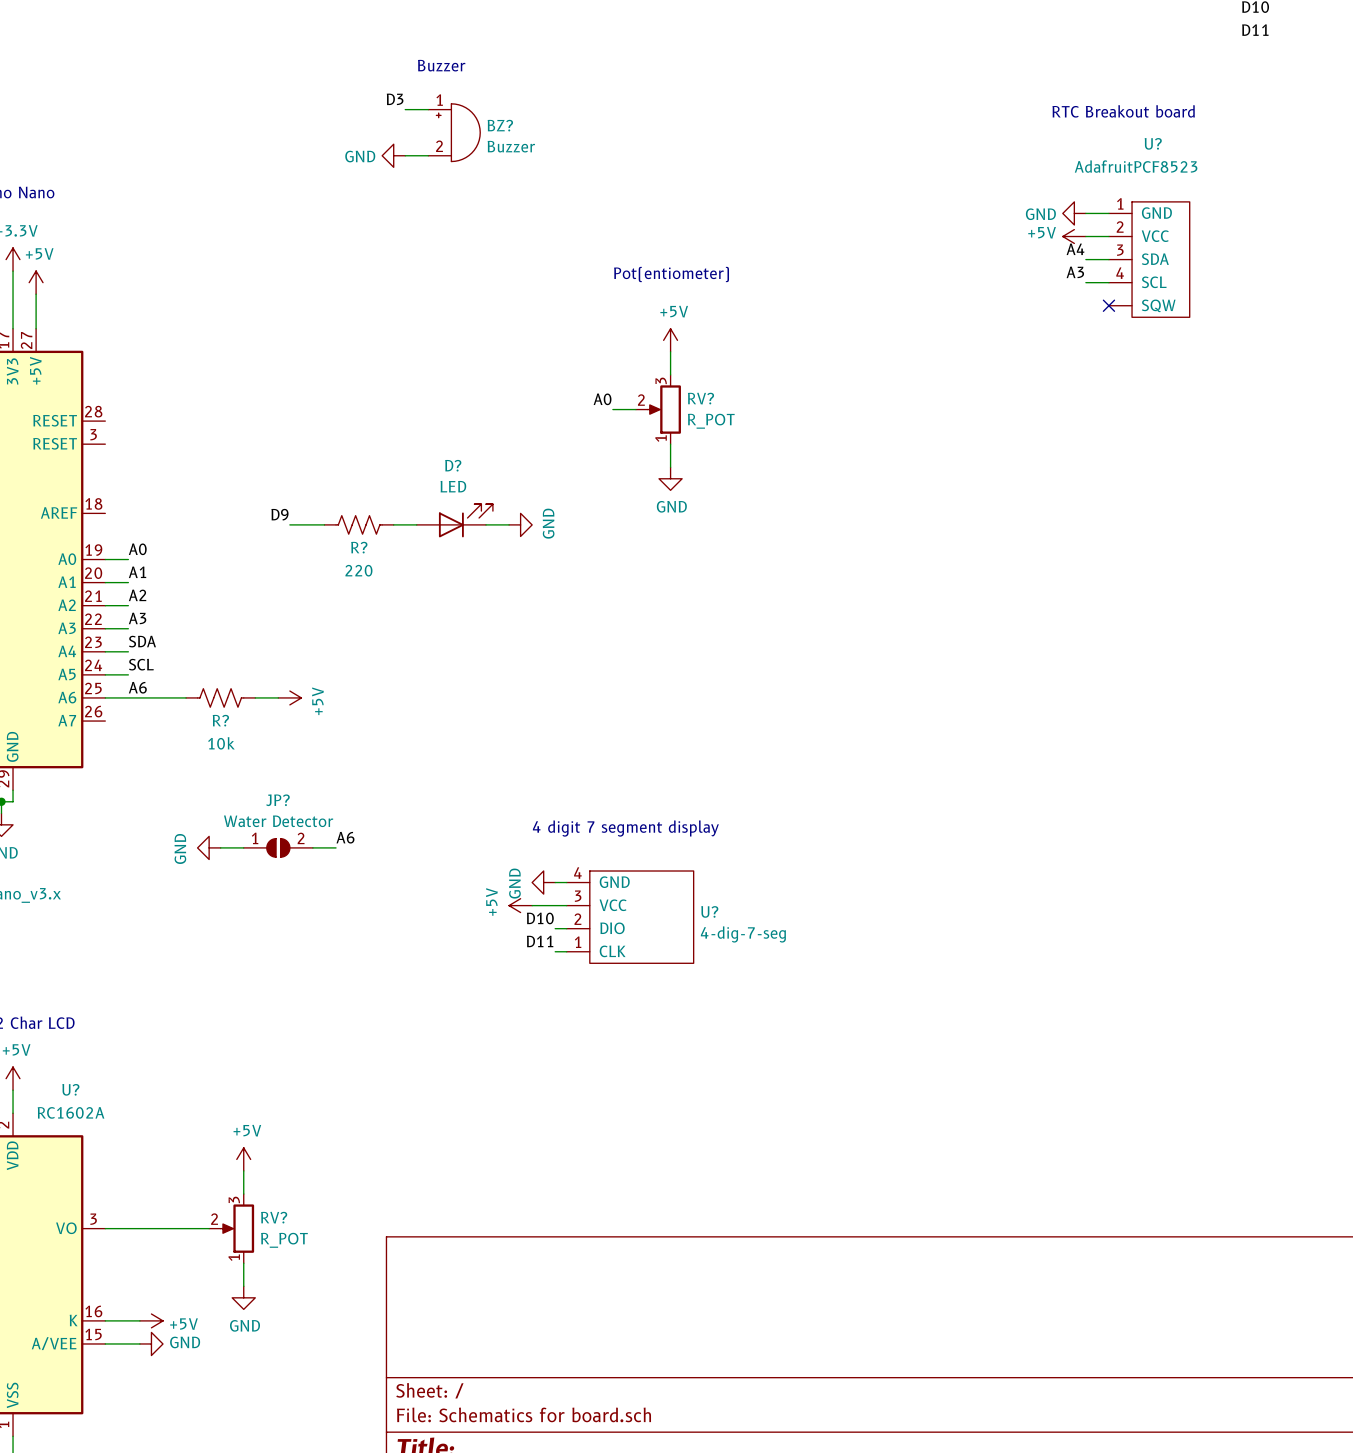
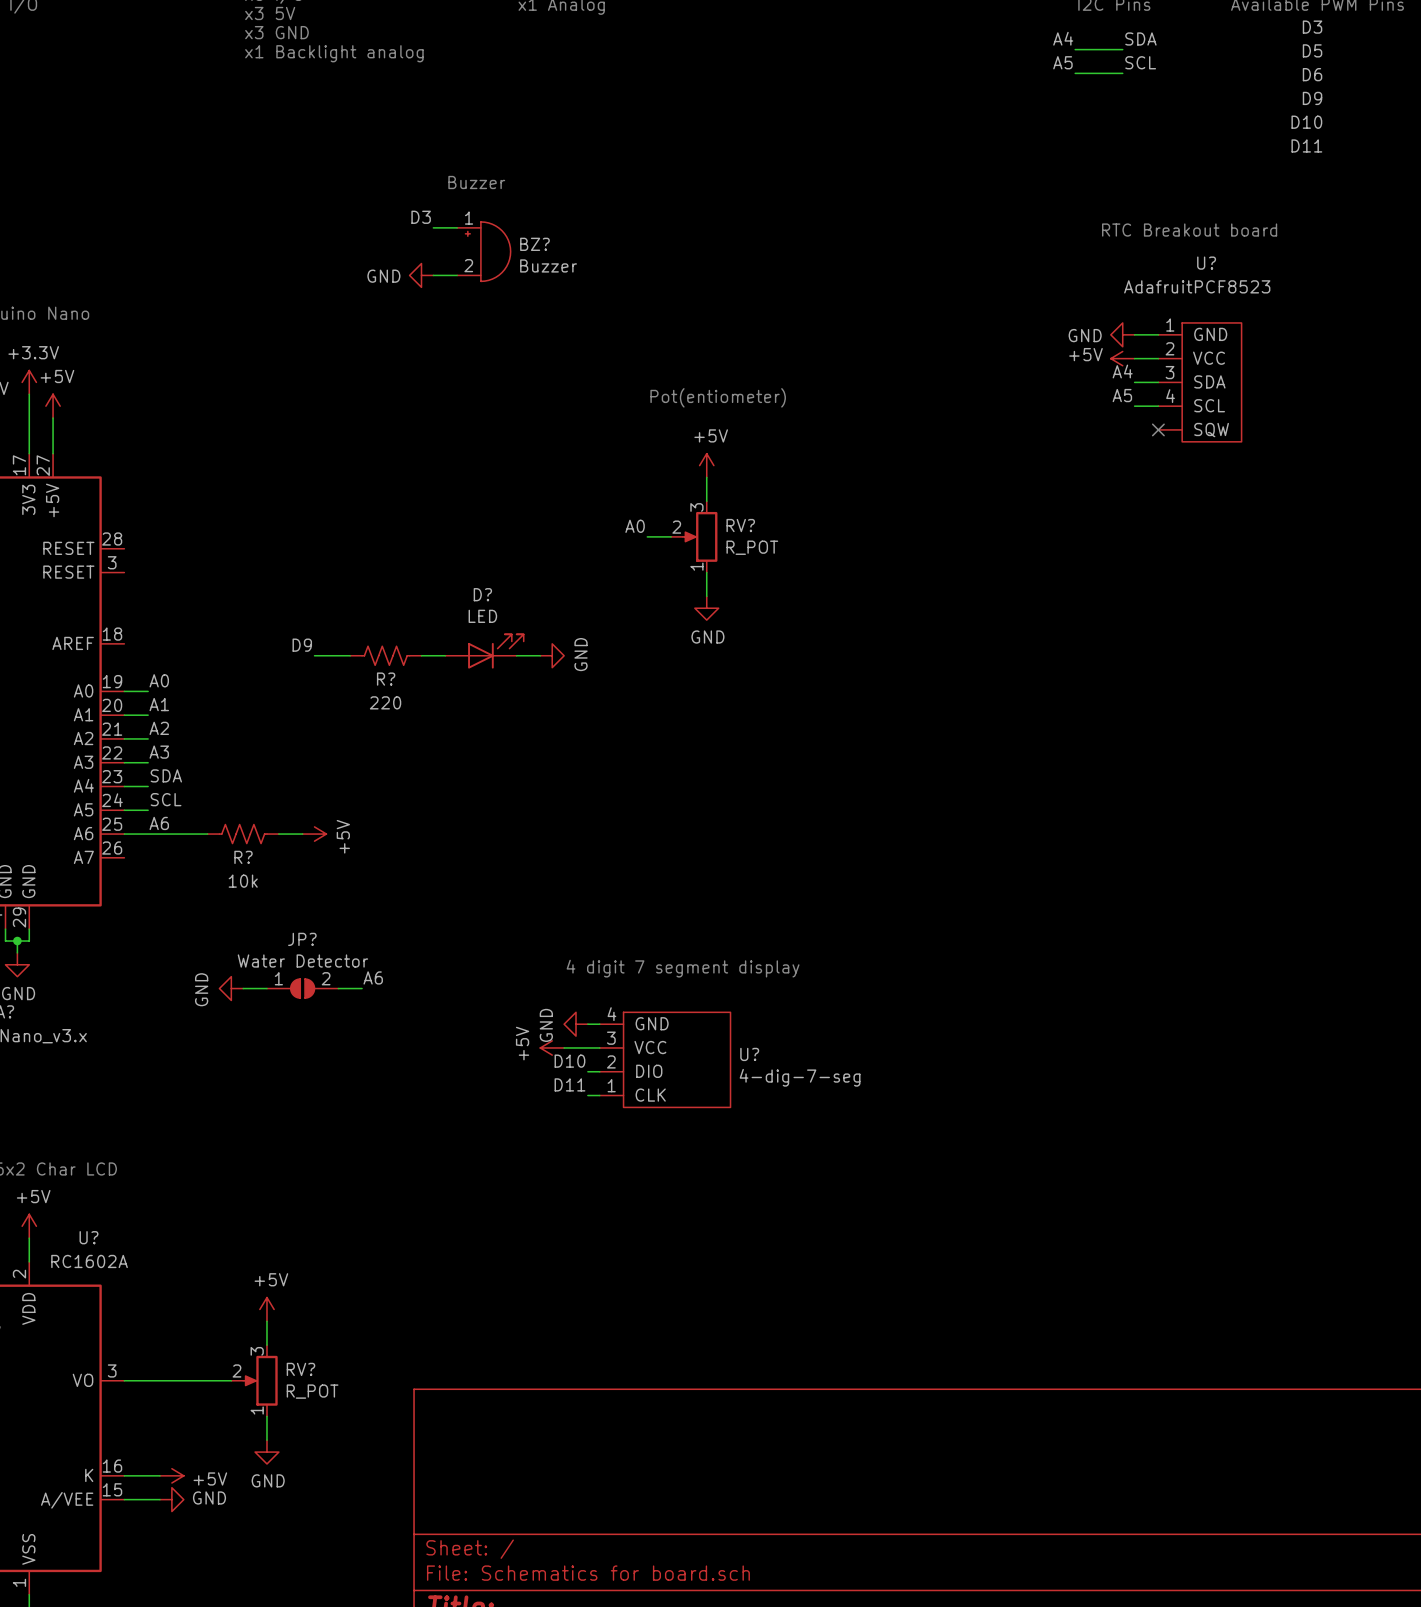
label: A3 (1075, 272) -> A5 (1122, 395)

